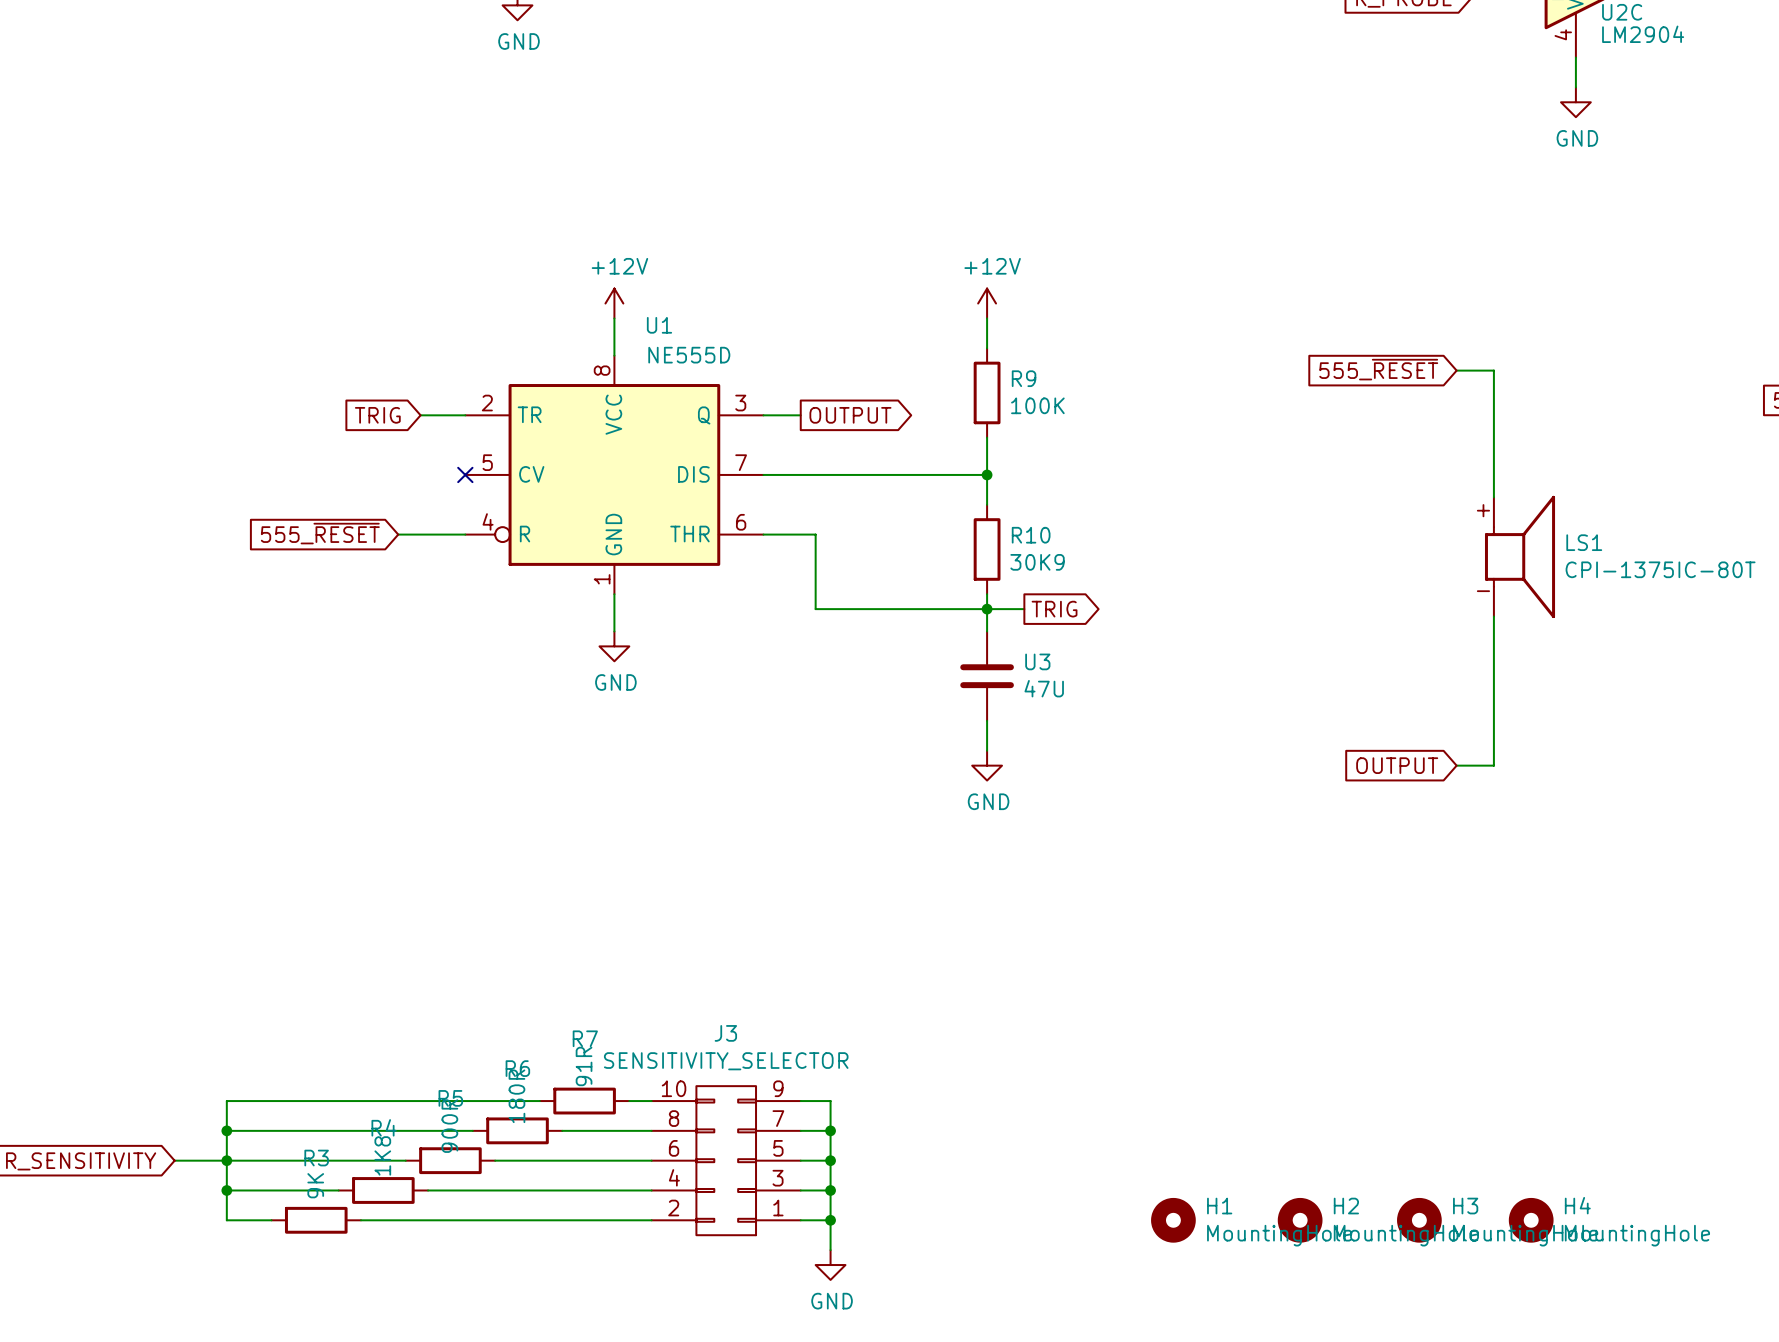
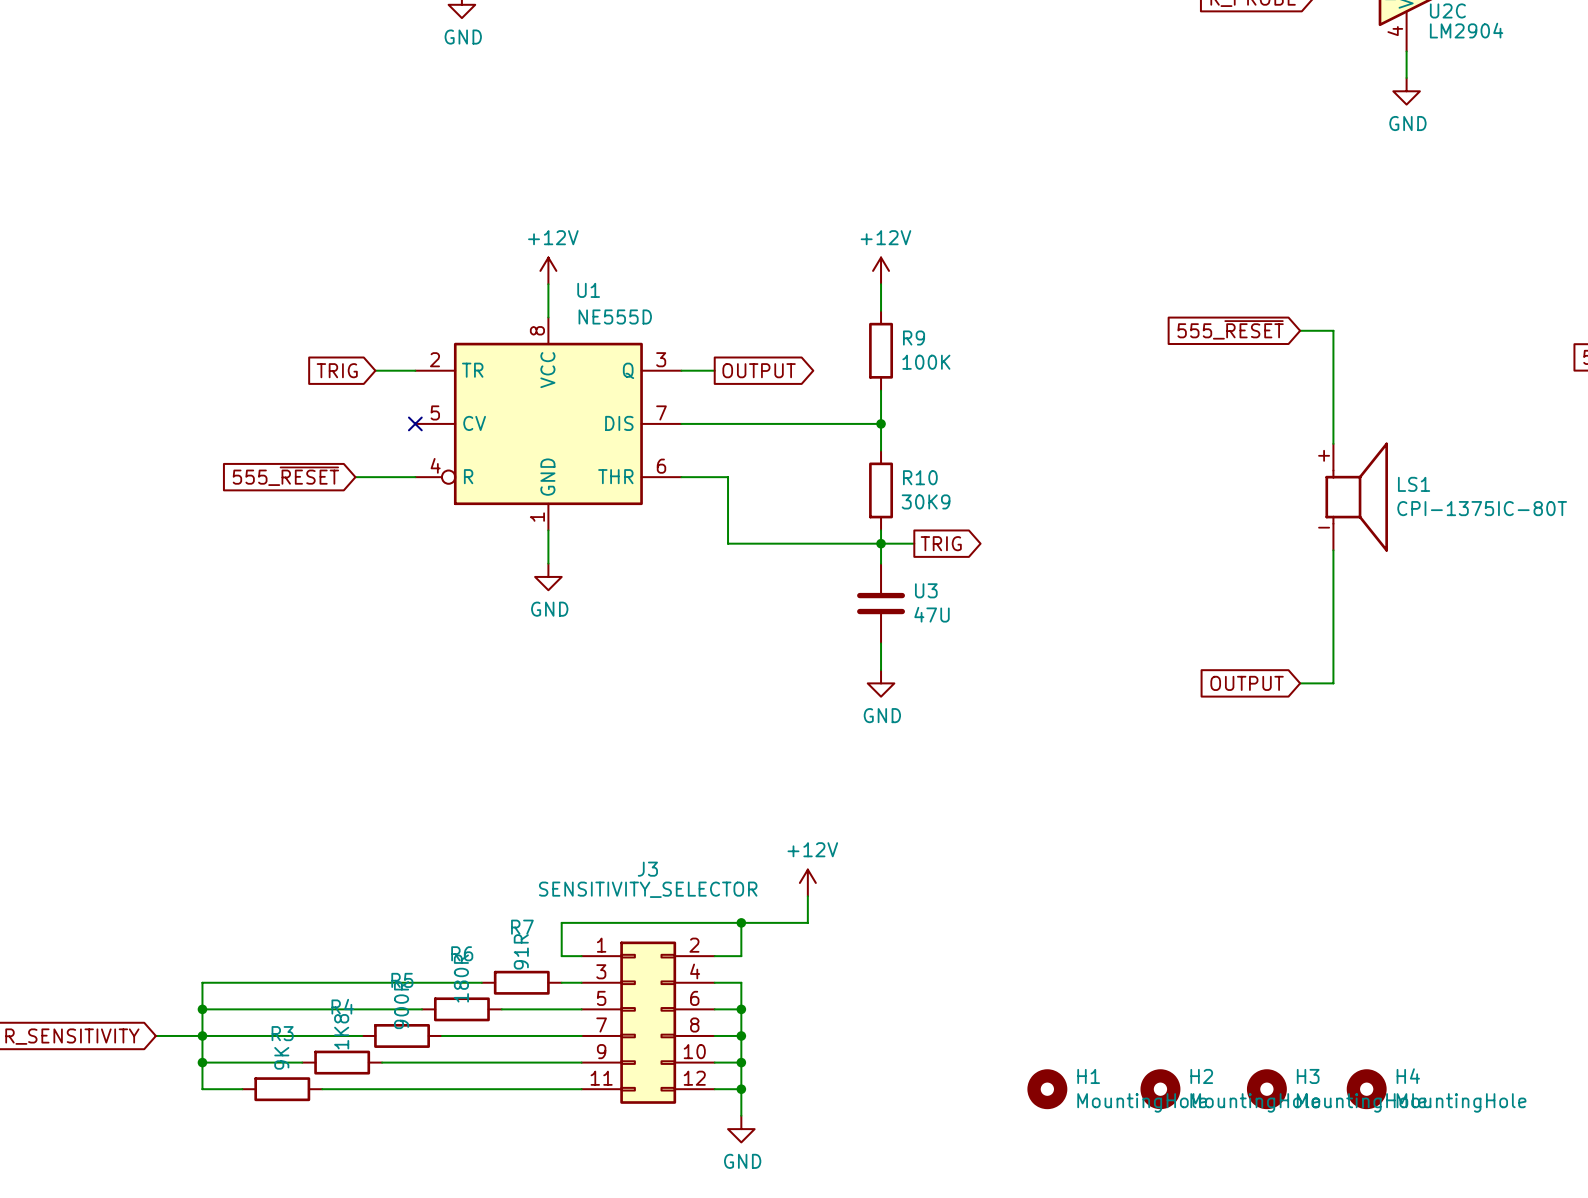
power symbol: none -> +12V (807, 882)
wire: none -> (807, 896) (807, 922) (561, 922) (561, 956) (581, 956)
J3 name position: J3 (725, 1033) -> J3 (647, 869)
wire: none -> (741, 922) (741, 956) (714, 956)
junction: none -> (741, 922)
J3 value position: SENSITIVITY_SELECTOR (726, 1061) -> SENSITIVITY_SELECTOR (648, 889)
J3 symbol: [651, 1086, 801, 1236] -> [581, 941, 715, 1104]

